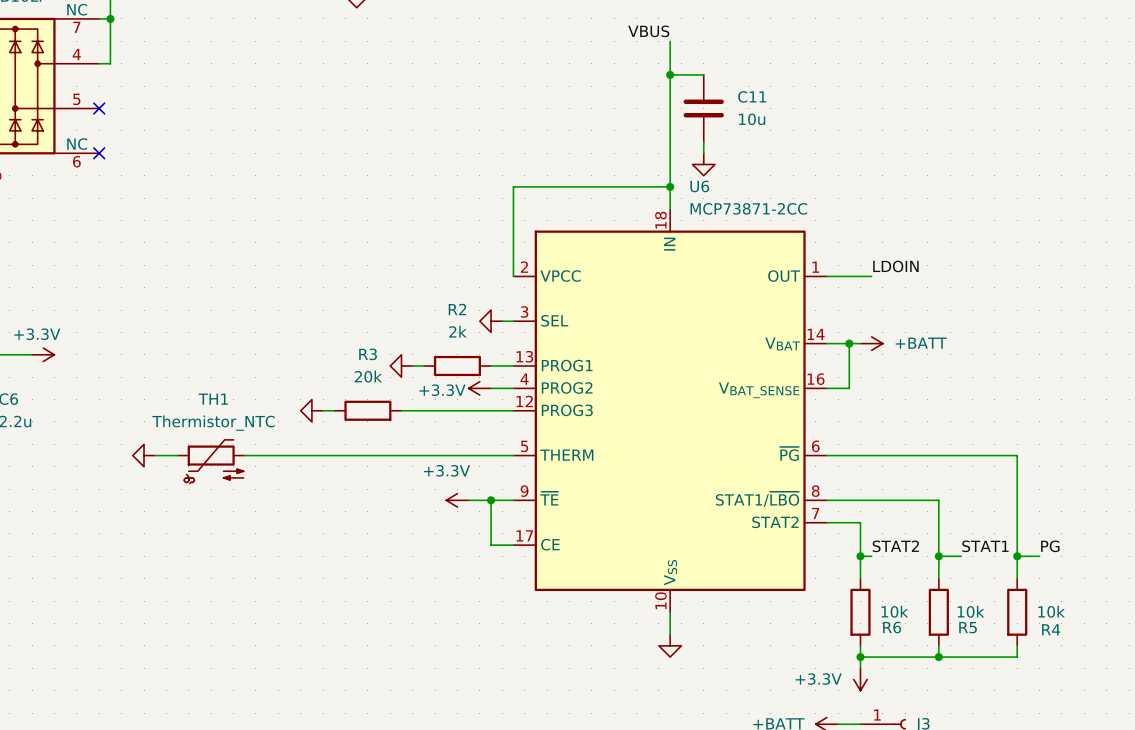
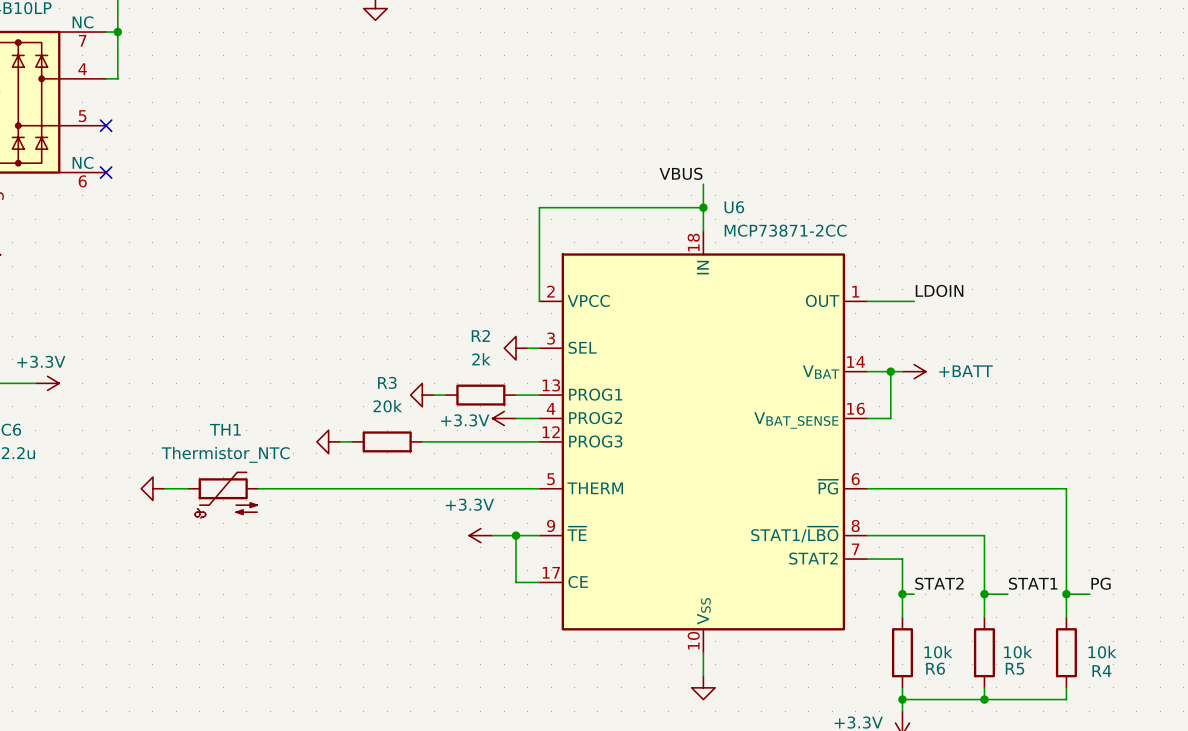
label position: VBUS (648, 31) -> VBUS (681, 173)
wire: (670, 41) (670, 164) -> none
wire: (670, 74) (703, 74) -> none
junction: (670, 74) -> none
C11: 10u (703, 108) -> none
wire: (703, 142) (703, 153) -> none
power symbol: (703, 164) -> none

